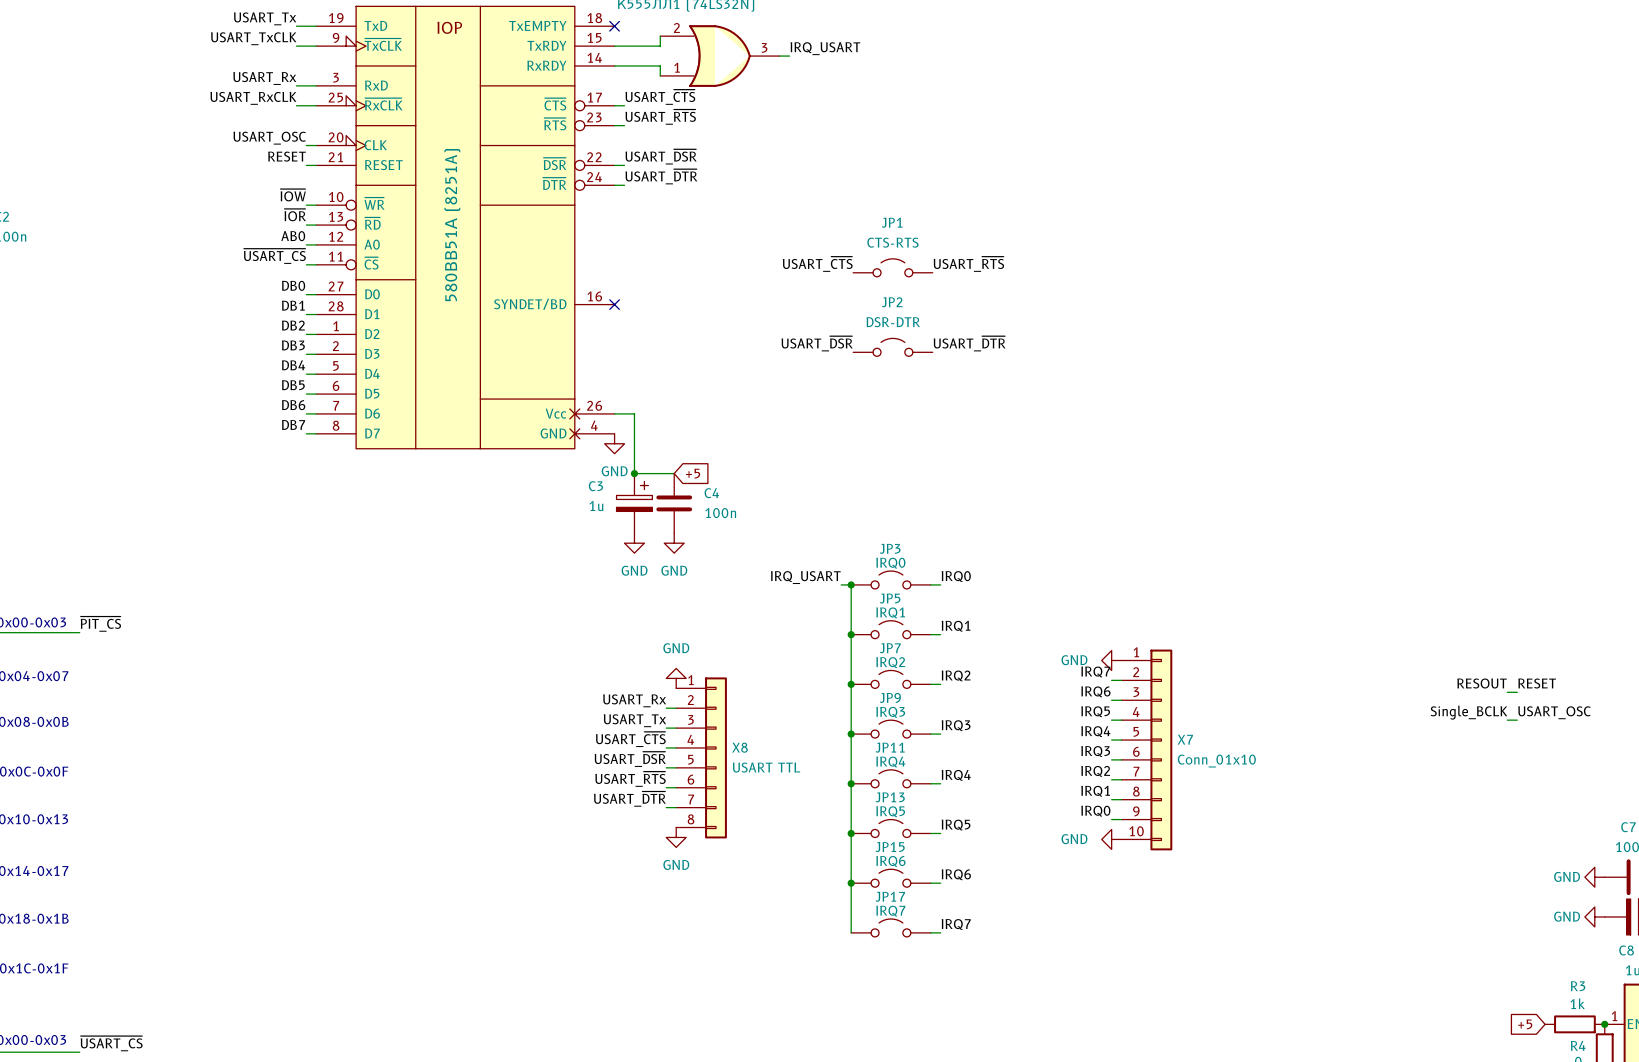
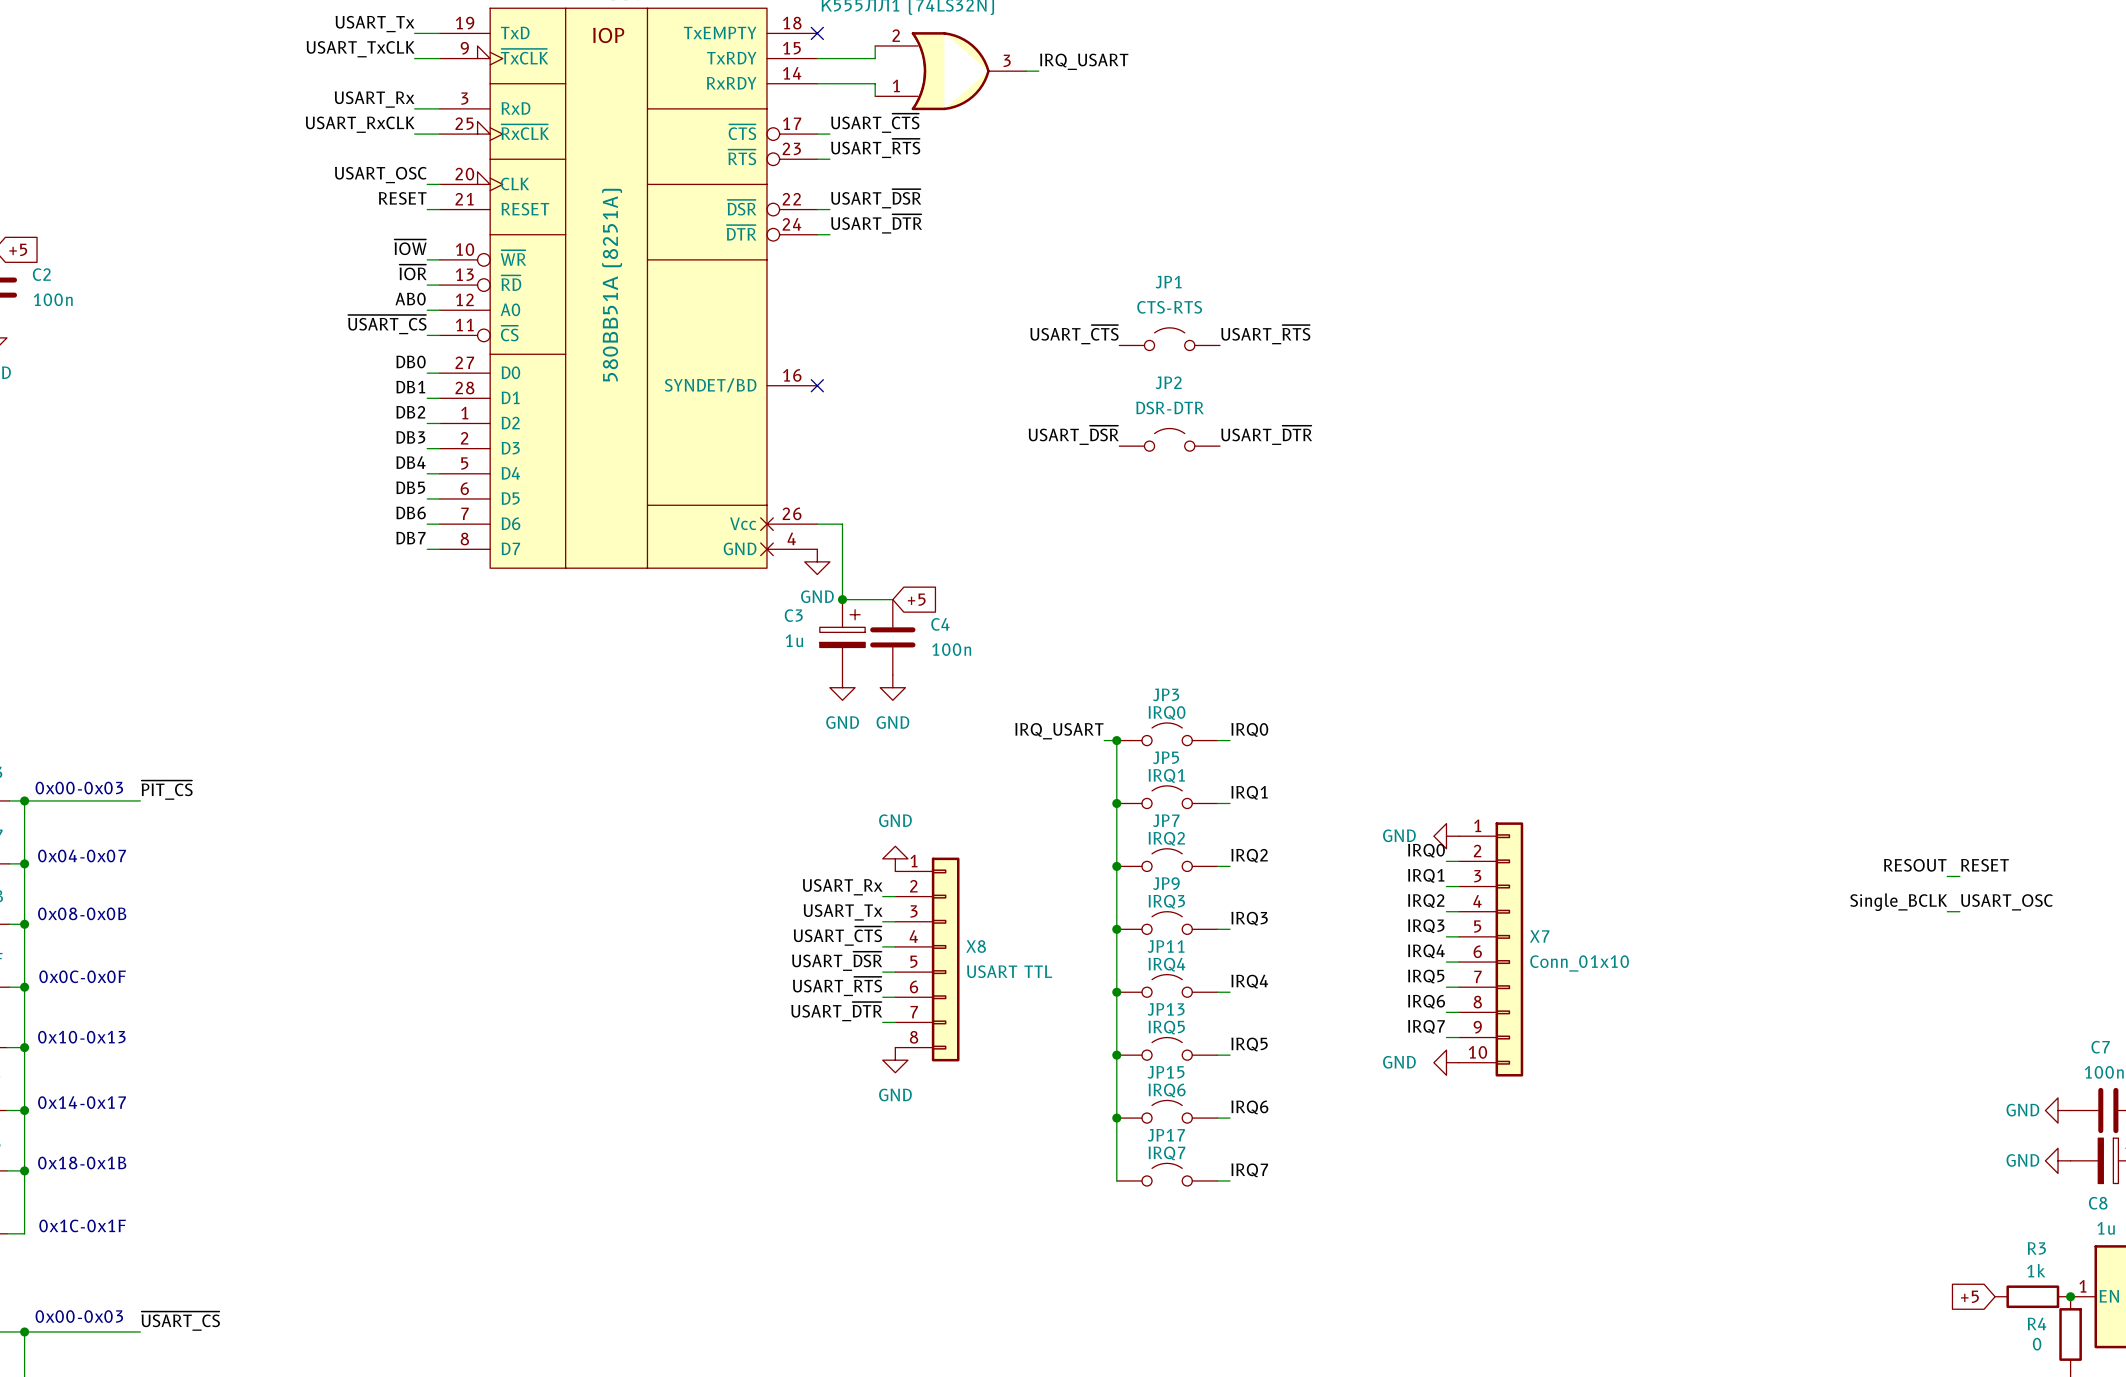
label: IRQ7 (1095, 671) -> IRQ0 (1426, 850)
label: IRQ6 (1095, 691) -> IRQ1 (1426, 875)
label: IRQ5 (1095, 711) -> IRQ2 (1426, 901)
label: IRQ4 (1095, 731) -> IRQ3 (1426, 926)
label: IRQ3 (1095, 751) -> IRQ4 (1426, 951)
label: IRQ2 (1095, 771) -> IRQ5 (1426, 976)
label: IRQ1 (1095, 791) -> IRQ6 (1426, 1001)
label: IRQ0 (1095, 811) -> IRQ7 (1426, 1026)

